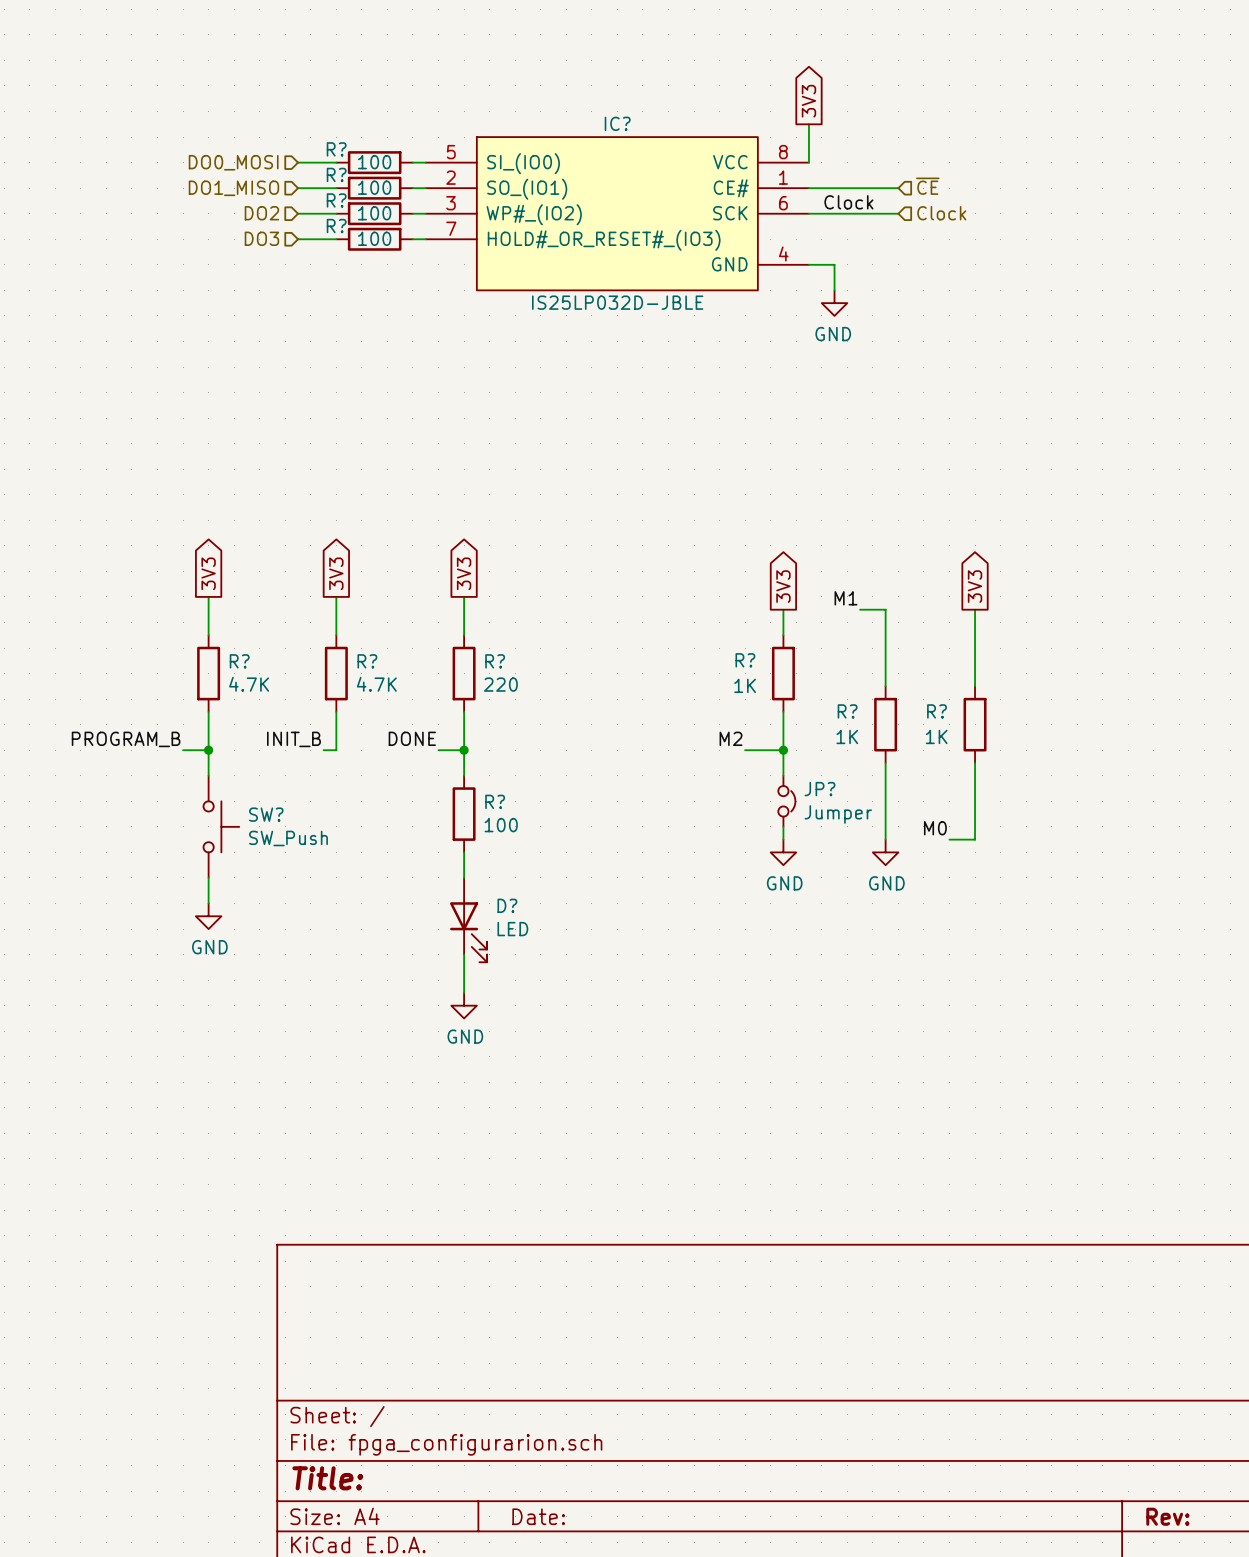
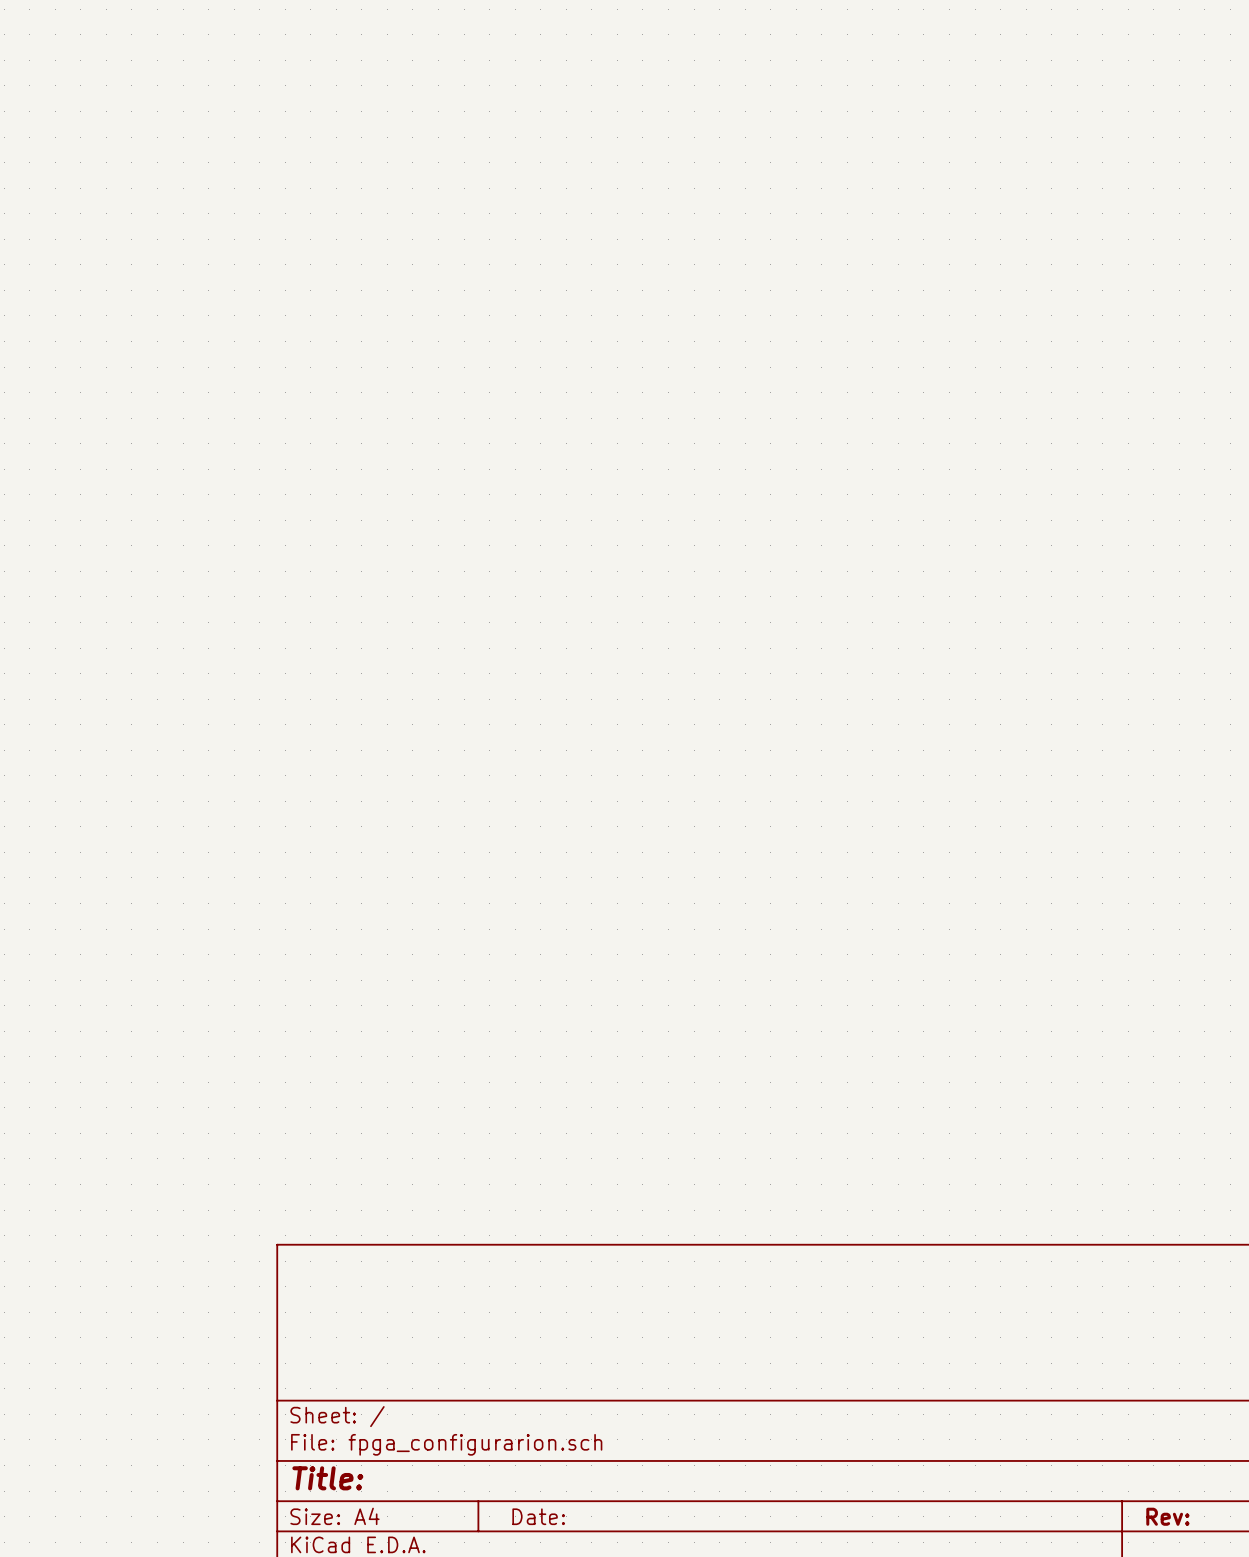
global label: 3V3 (808, 101) -> none
wire: (808, 124) (808, 162) -> none
hierarchical label: DO0_MOSI (233, 162) -> none
wire: (298, 162) (336, 162) -> none
R?: 100 (374, 162) -> none
wire: (412, 162) (425, 162) -> none
hierarchical label: ~{CE} (927, 186) -> none
hierarchical label: DO1_MISO (233, 188) -> none
wire: (298, 188) (336, 188) -> none
R?: 100 (374, 188) -> none
wire: (412, 188) (425, 188) -> none
wire: (808, 188) (898, 188) -> none
label: Clock (848, 202) -> none
hierarchical label: DO2 (261, 213) -> none
wire: (298, 213) (336, 213) -> none
R?: 100 (374, 213) -> none
wire: (412, 213) (425, 213) -> none
IC?: IS25LP032D-JBLE (617, 213) -> none
wire: (808, 213) (898, 213) -> none
hierarchical label: Clock (941, 213) -> none
hierarchical label: DO3 (261, 238) -> none
wire: (298, 239) (336, 239) -> none
R?: 100 (374, 239) -> none
wire: (412, 239) (425, 239) -> none
wire: (808, 264) (834, 264) (834, 290) -> none
power symbol: GND (834, 303) -> none
global label: 3V3 (208, 573) -> none
global label: 3V3 (336, 573) -> none
global label: 3V3 (464, 573) -> none
global label: 3V3 (783, 586) -> none
global label: 3V3 (975, 586) -> none
wire: (208, 596) (208, 635) -> none
wire: (336, 596) (336, 635) -> none
wire: (464, 596) (464, 635) -> none
label: M1 (845, 598) -> none
wire: (783, 609) (783, 635) -> none
wire: (860, 609) (885, 609) (885, 686) -> none
wire: (975, 609) (975, 686) -> none
R?: 4.7K (208, 673) -> none
R?: 4.7K (336, 673) -> none
R?: 220 (464, 673) -> none
R?: 1K (783, 673) -> none
wire: (208, 711) (208, 775) -> none
wire: (336, 711) (336, 750) (323, 750) -> none
wire: (464, 711) (464, 775) -> none
wire: (783, 711) (783, 775) -> none
R?: 1K (885, 724) -> none
R?: 1K (975, 724) -> none
label: DONE (412, 738) -> none
label: M2 (731, 738) -> none
label: PROGRAM_B (126, 739) -> none
label: INIT_B (293, 739) -> none
wire: (183, 750) (208, 750) -> none
junction: (208, 750) -> none
wire: (438, 750) (464, 750) -> none
junction: (464, 750) -> none
wire: (745, 750) (783, 750) -> none
junction: (783, 750) -> none
wire: (885, 762) (885, 839) -> none
wire: (975, 762) (975, 839) (949, 839) -> none
JP?: Jumper (786, 801) -> none
R?: 100 (464, 814) -> none
SW?: SW_Push (221, 826) -> none
wire: (783, 826) (783, 839) -> none
label: M0 (935, 828) -> none
wire: (464, 852) (464, 877) -> none
power symbol: GND (783, 852) -> none
power symbol: GND (885, 852) -> none
wire: (208, 877) (208, 903) -> none
power symbol: GND (208, 916) -> none
D?: LED (468, 920) -> none
wire: (464, 954) (464, 992) -> none
power symbol: GND (464, 1005) -> none

